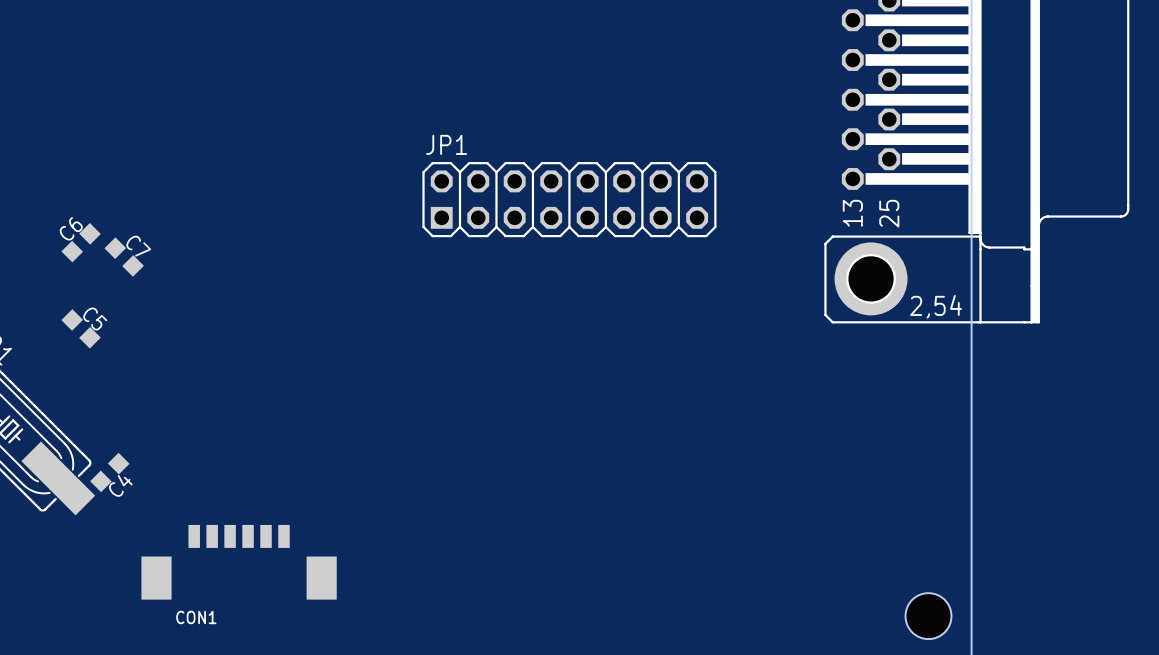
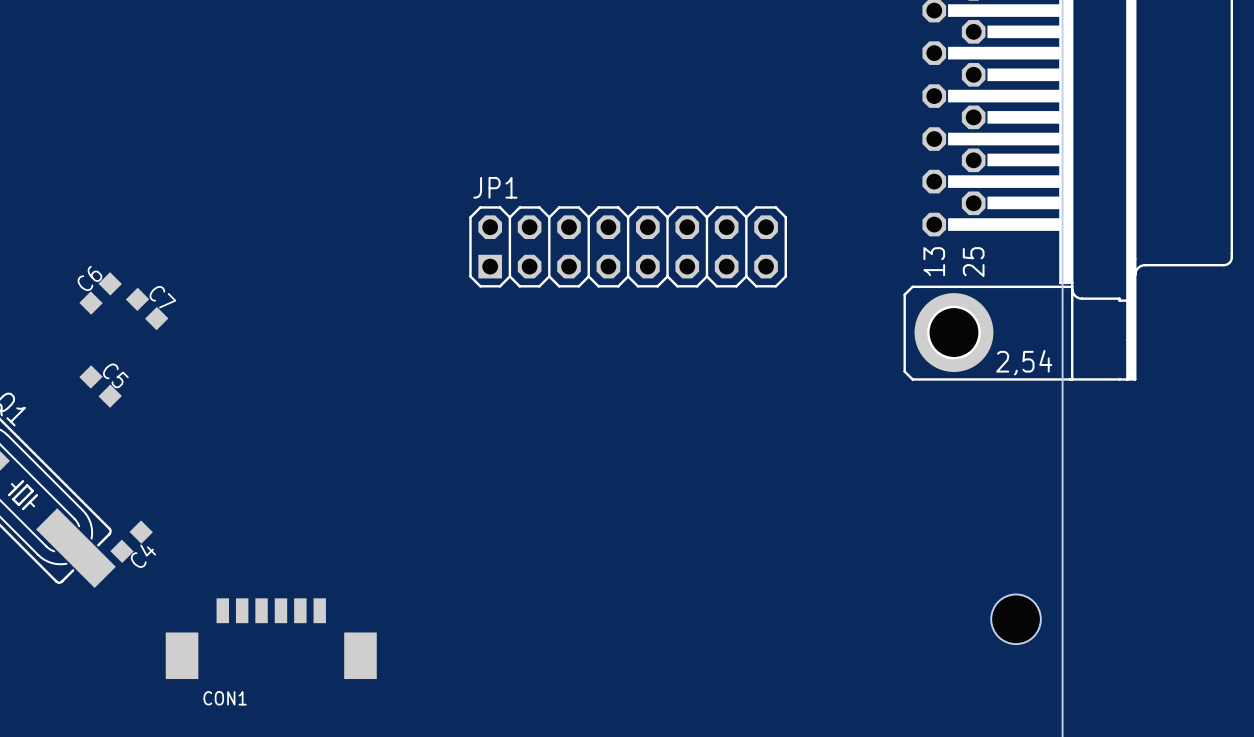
hole position: (928, 616) -> (1016, 619)

